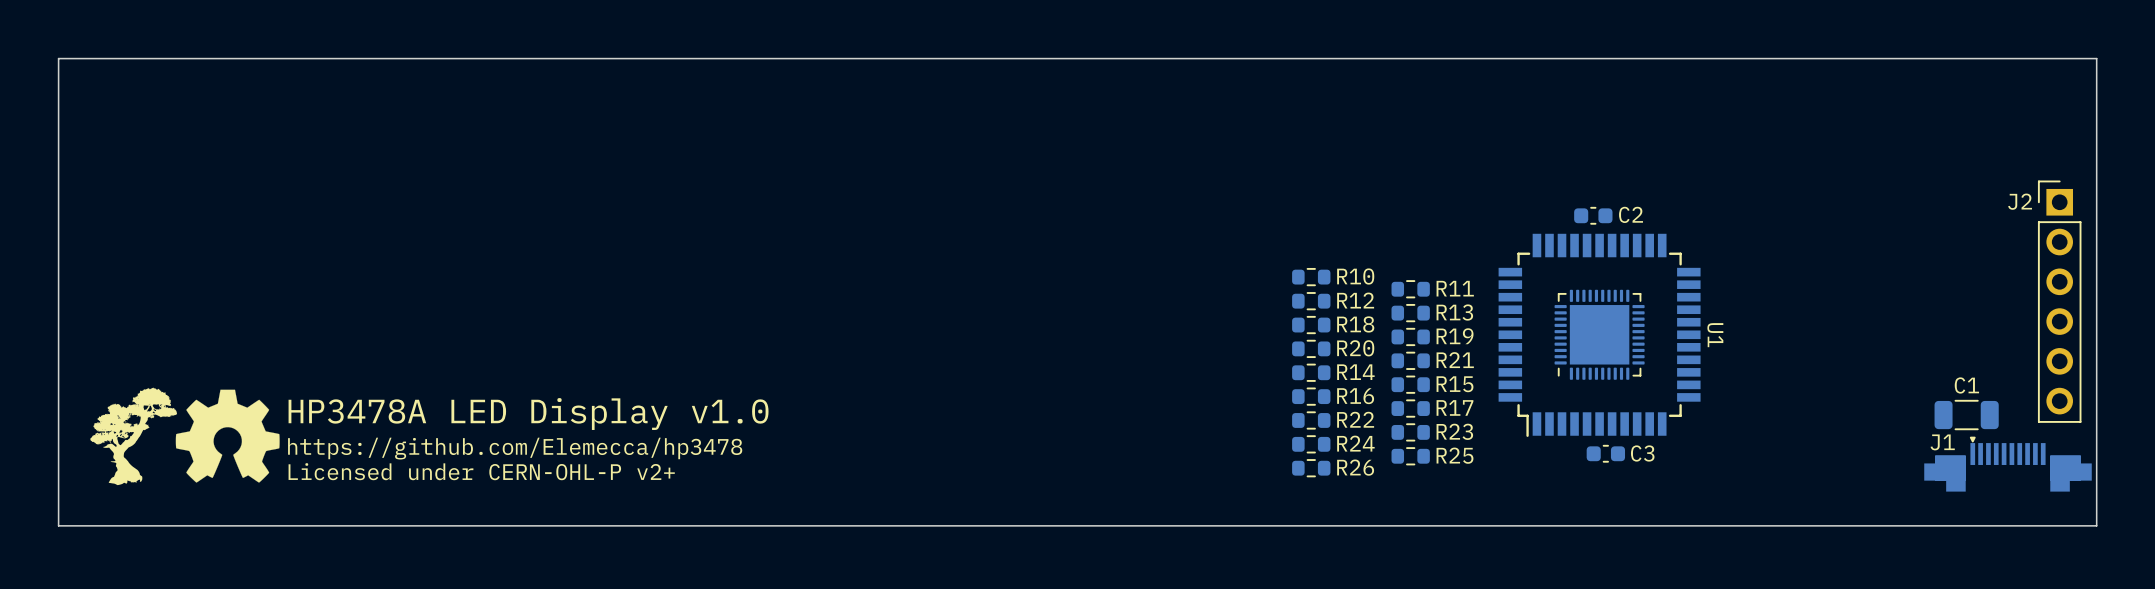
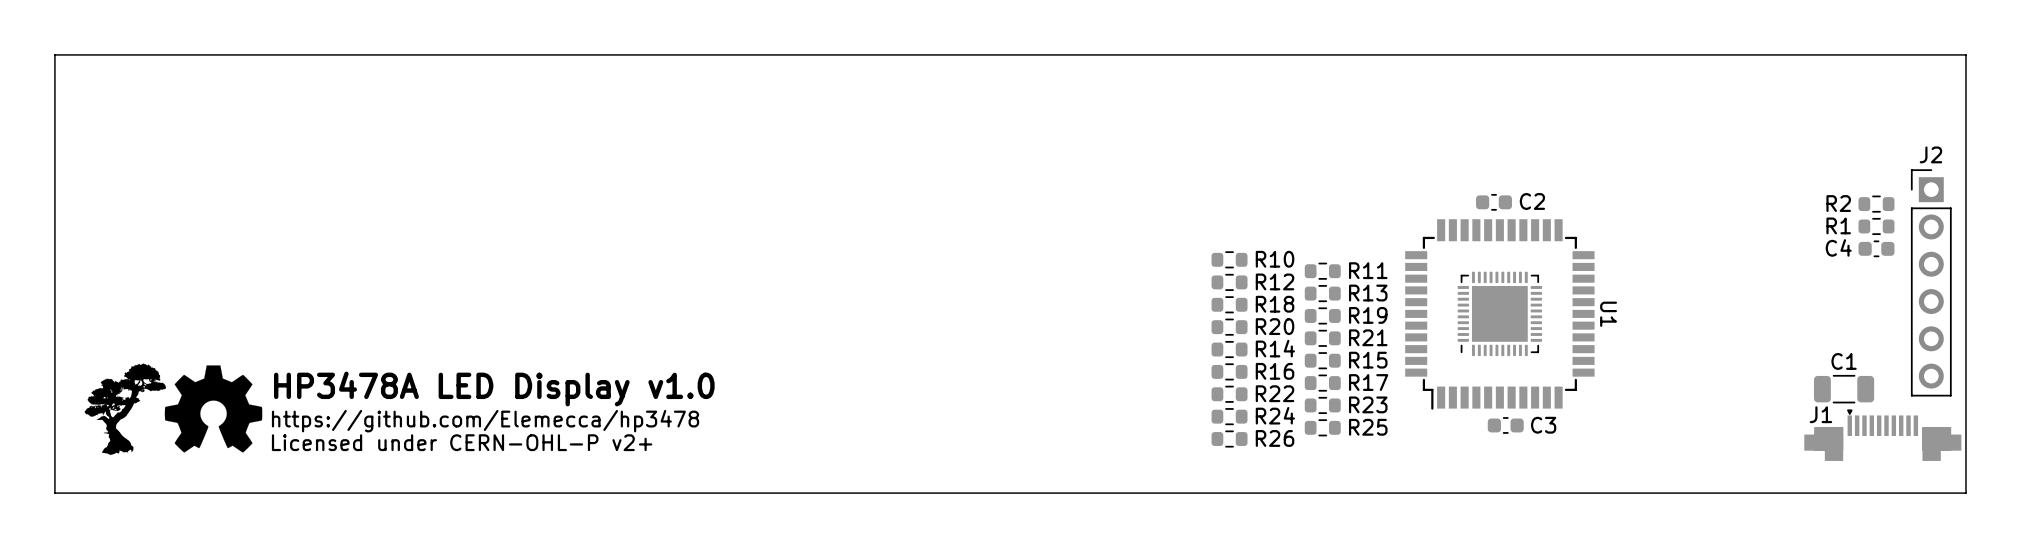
J2 name position: J2 (2020, 201) -> J2 (1930, 154)
R2: none -> (1876, 204)
R1: none -> (1876, 226)
C4: none -> (1876, 248)

